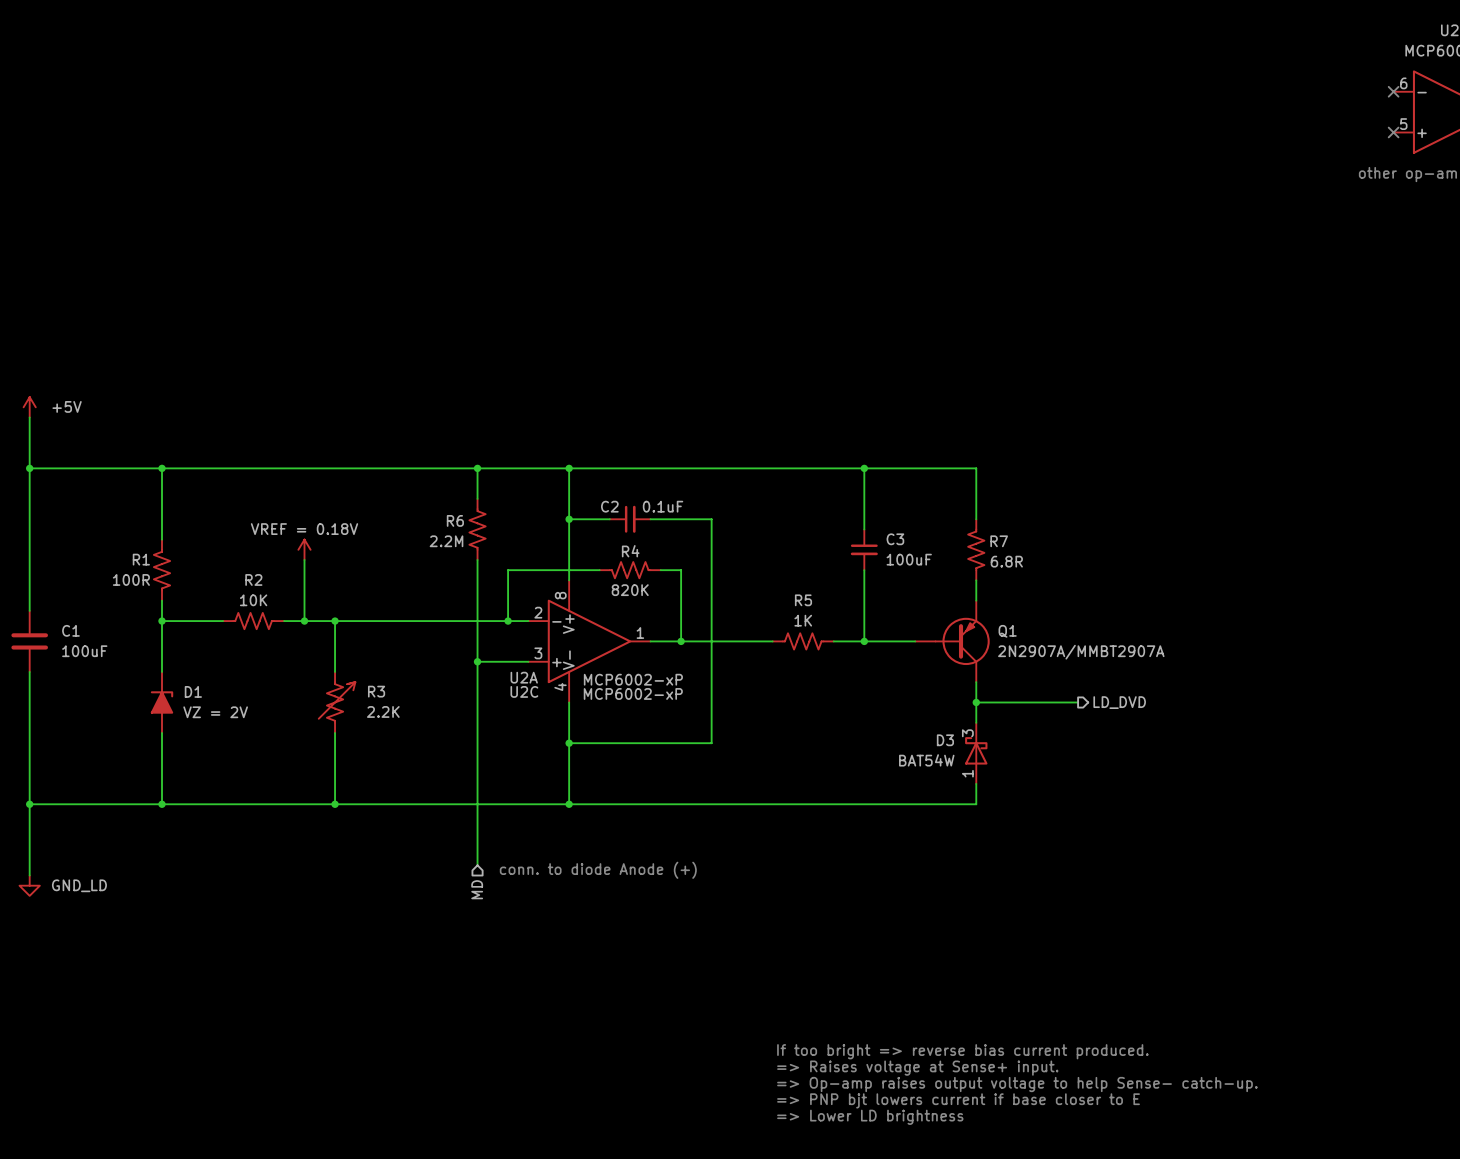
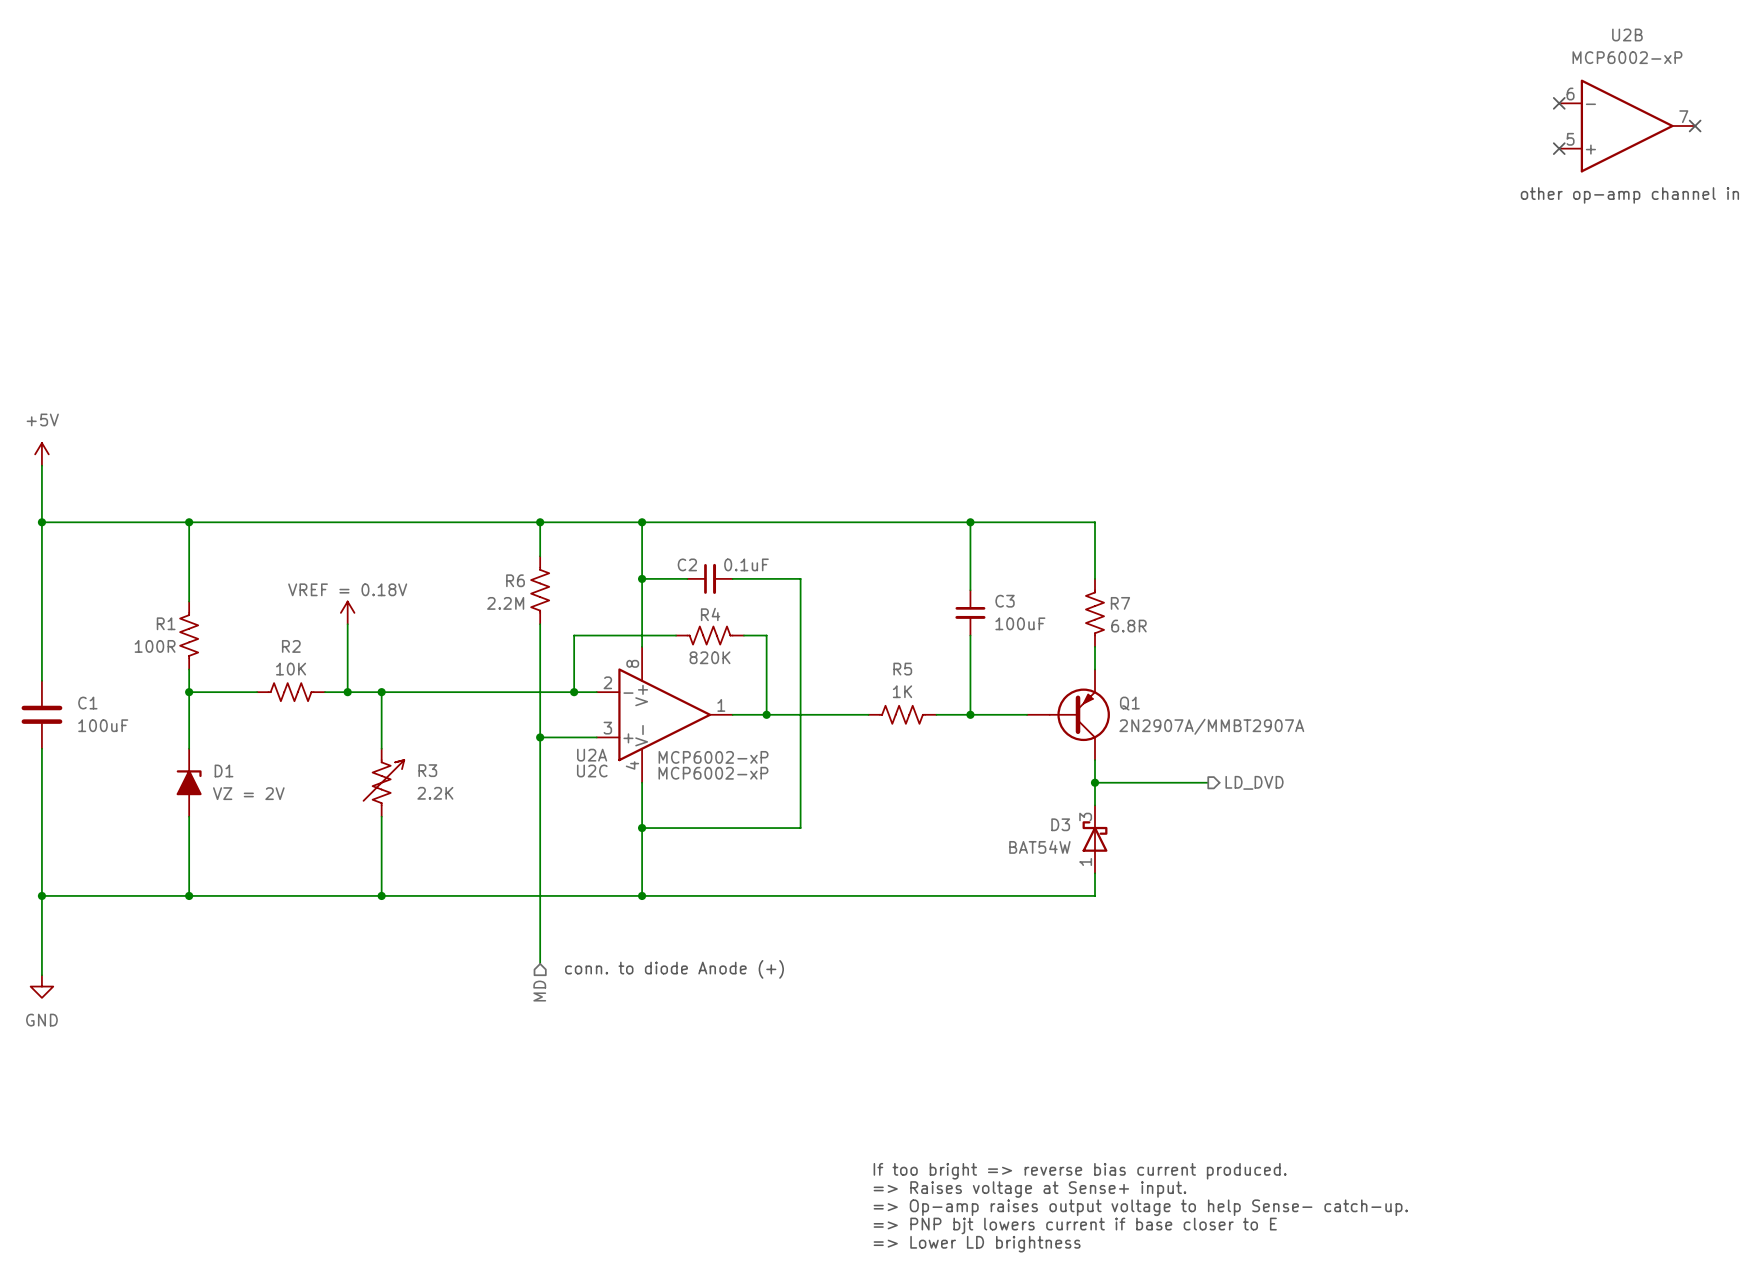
power symbol text position: +5V (67, 406) -> +5V (42, 419)
power symbol: GND_LD (29, 885) -> GND (41, 986)

